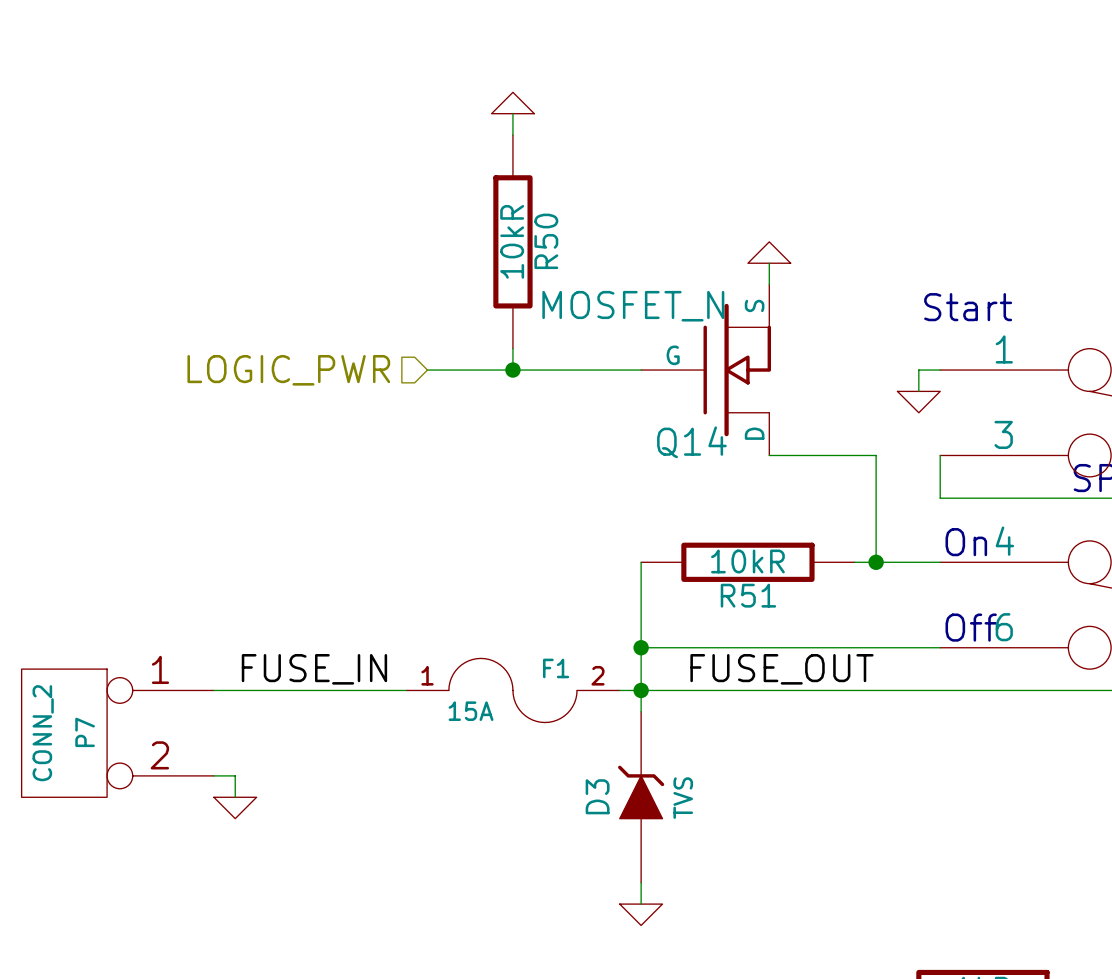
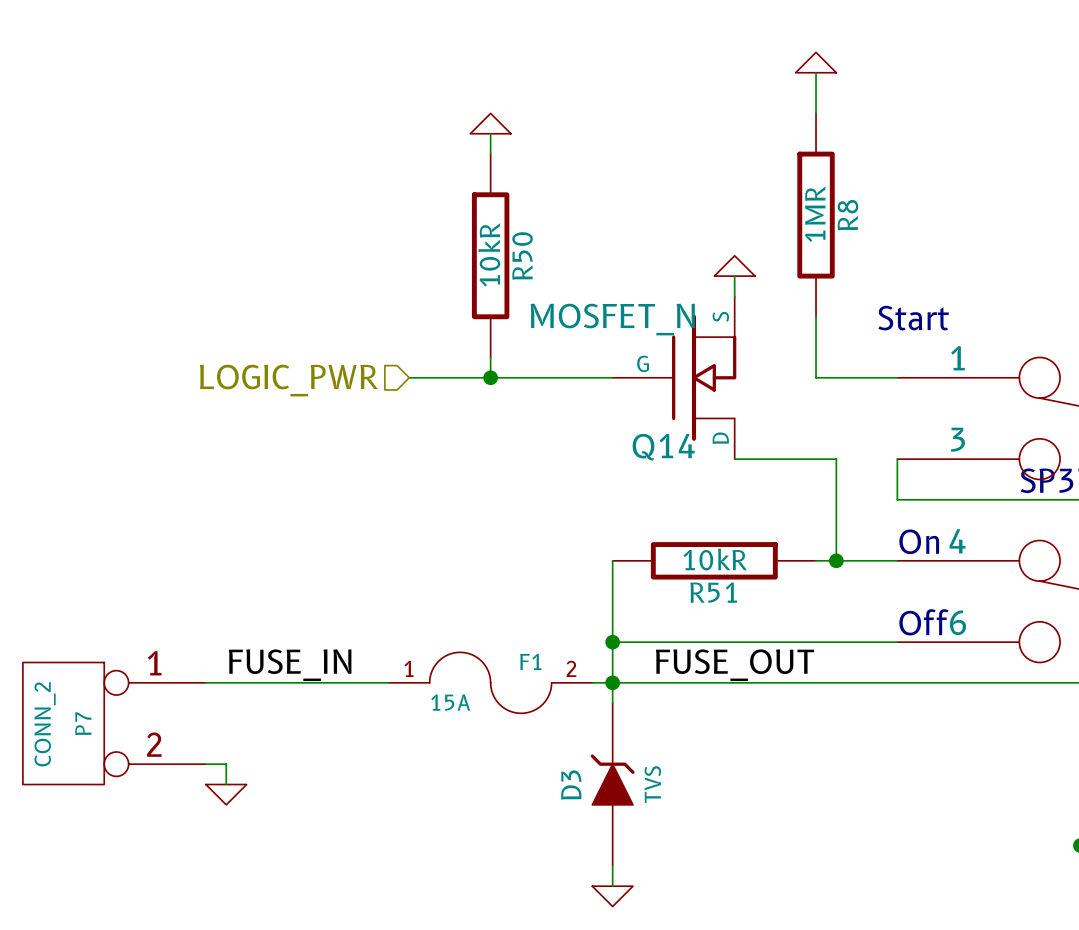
wire: none -> (816, 72) (816, 113)
R8: none -> 1MR (816, 215)
wire: (918, 370) (918, 391) -> (877, 377) (816, 377) (816, 316)
power symbol rotation: 0° (918, 402) -> 180° (816, 62)
power symbol position: (918, 402) -> (816, 62)

